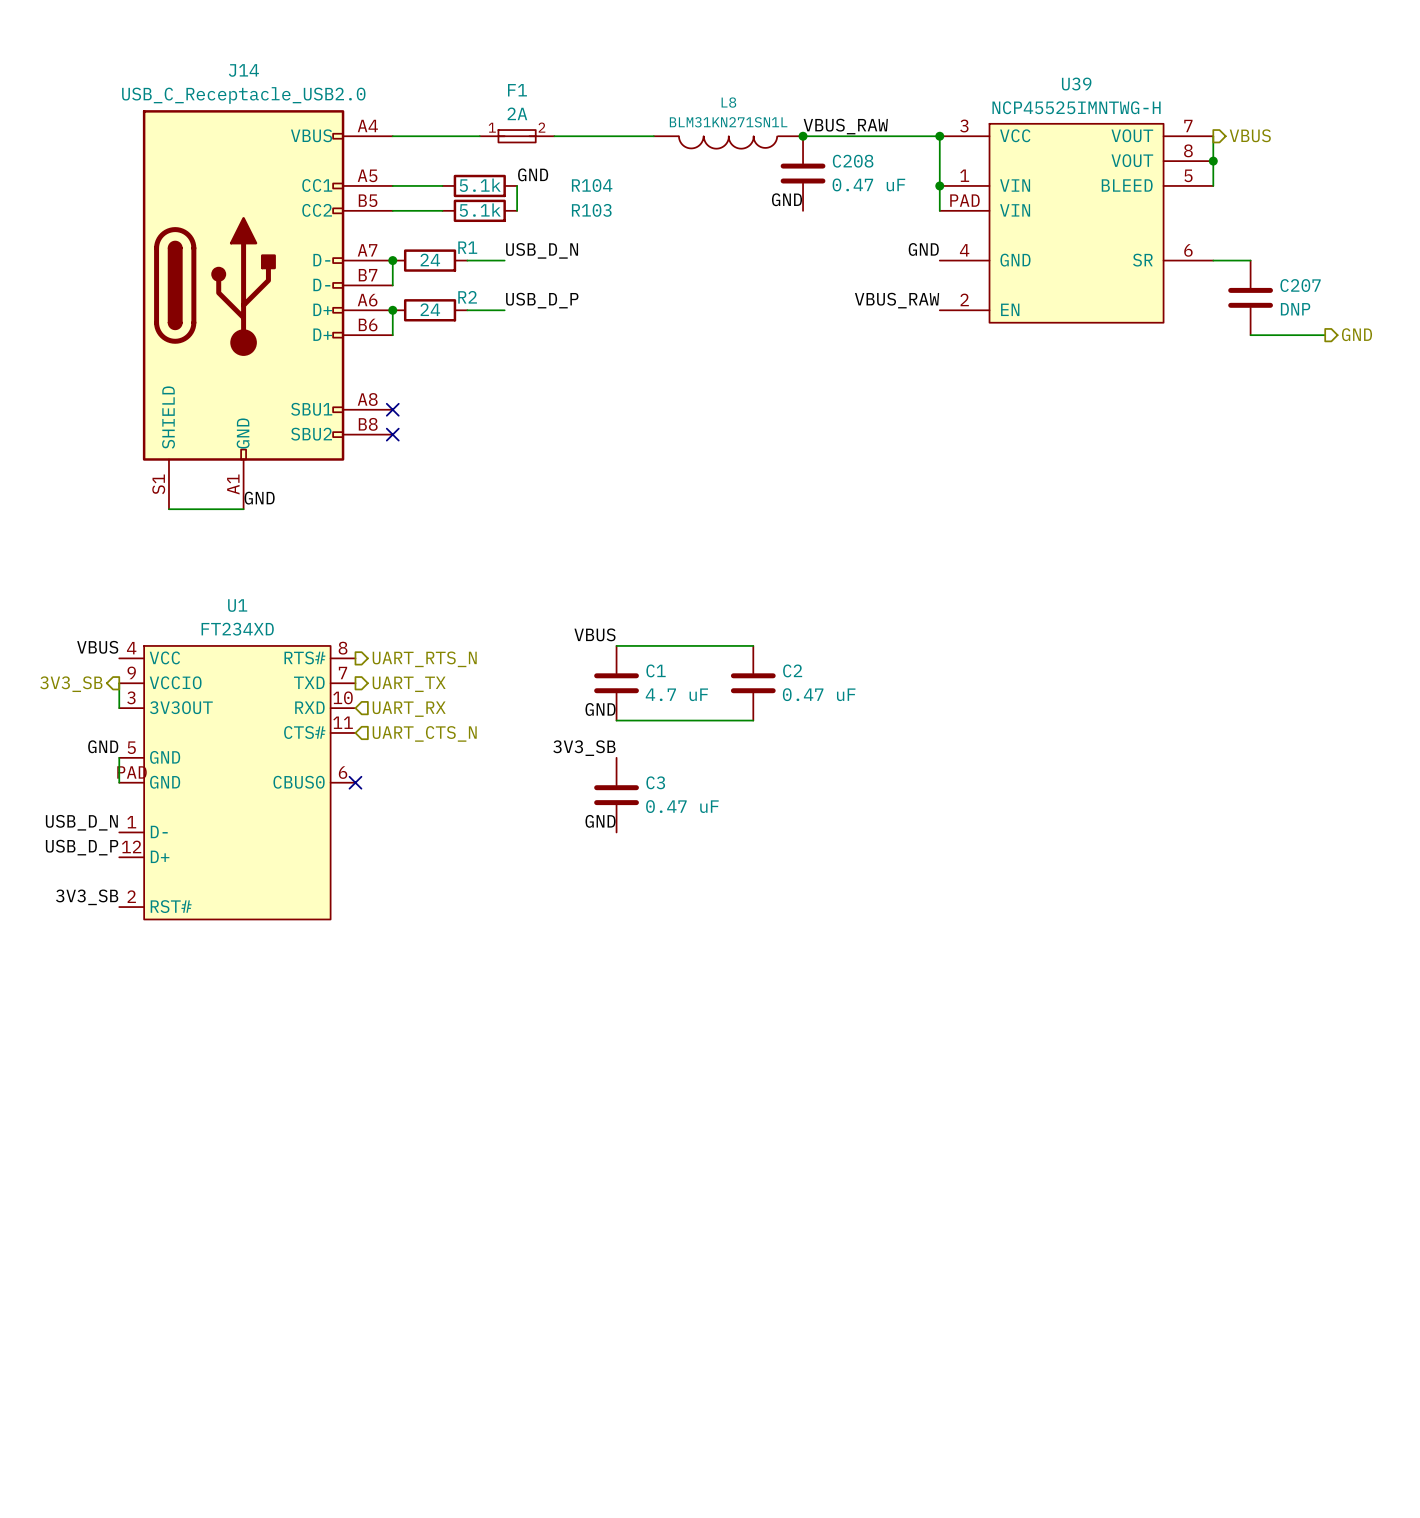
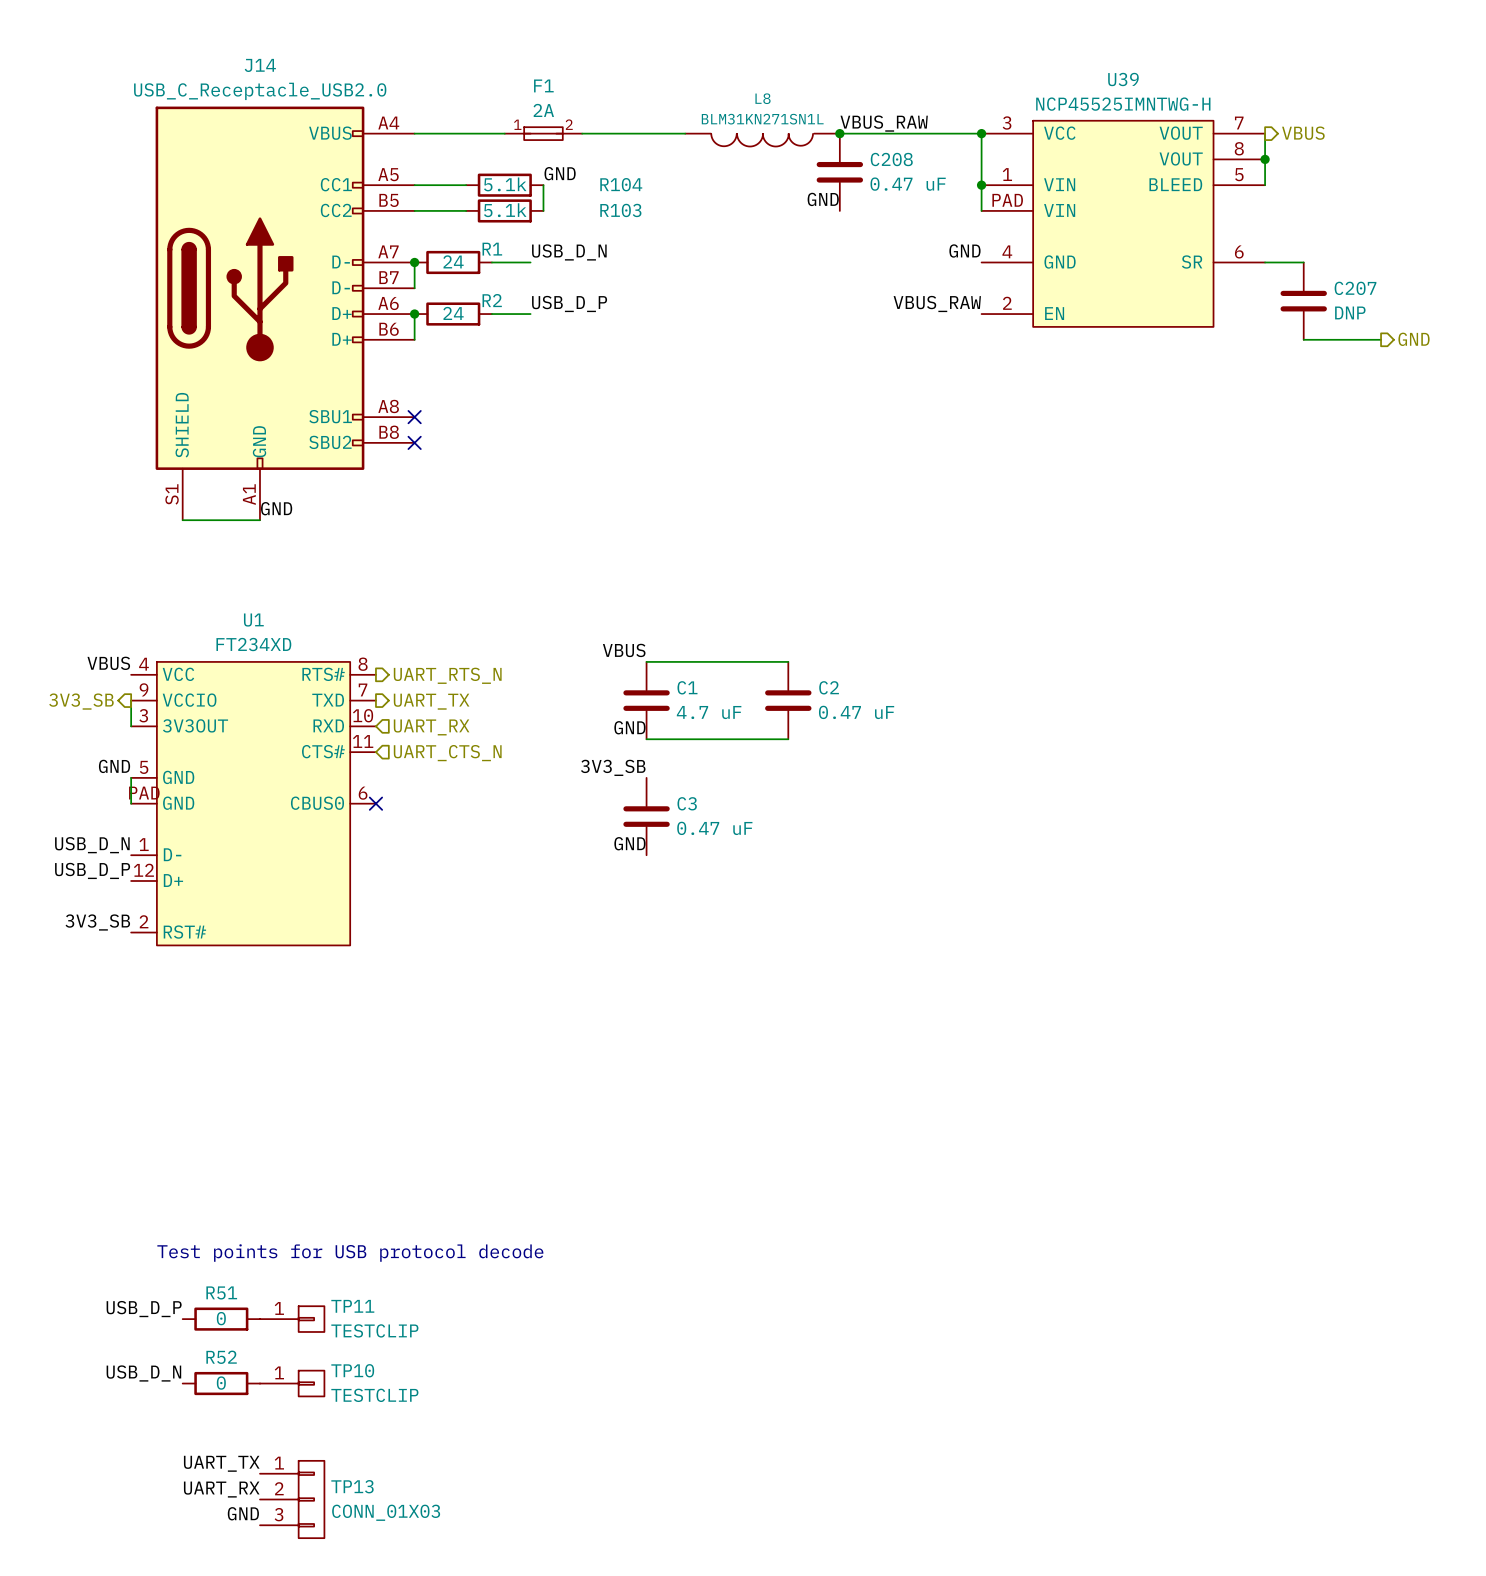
text: none -> Test points for USB protocol decode (350, 1253)
label: none -> USB_D_P (144, 1309)
R51: none -> 0 (221, 1319)
TP11: none -> TESTCLIP (292, 1319)
label: none -> USB_D_N (143, 1373)
R52: none -> 0 (221, 1383)
TP10: none -> TESTCLIP (292, 1383)
label: none -> UART_TX (221, 1463)
label: none -> UART_RX (221, 1489)
TP13: none -> CONN_01X03 (292, 1499)
label: none -> GND (243, 1513)

